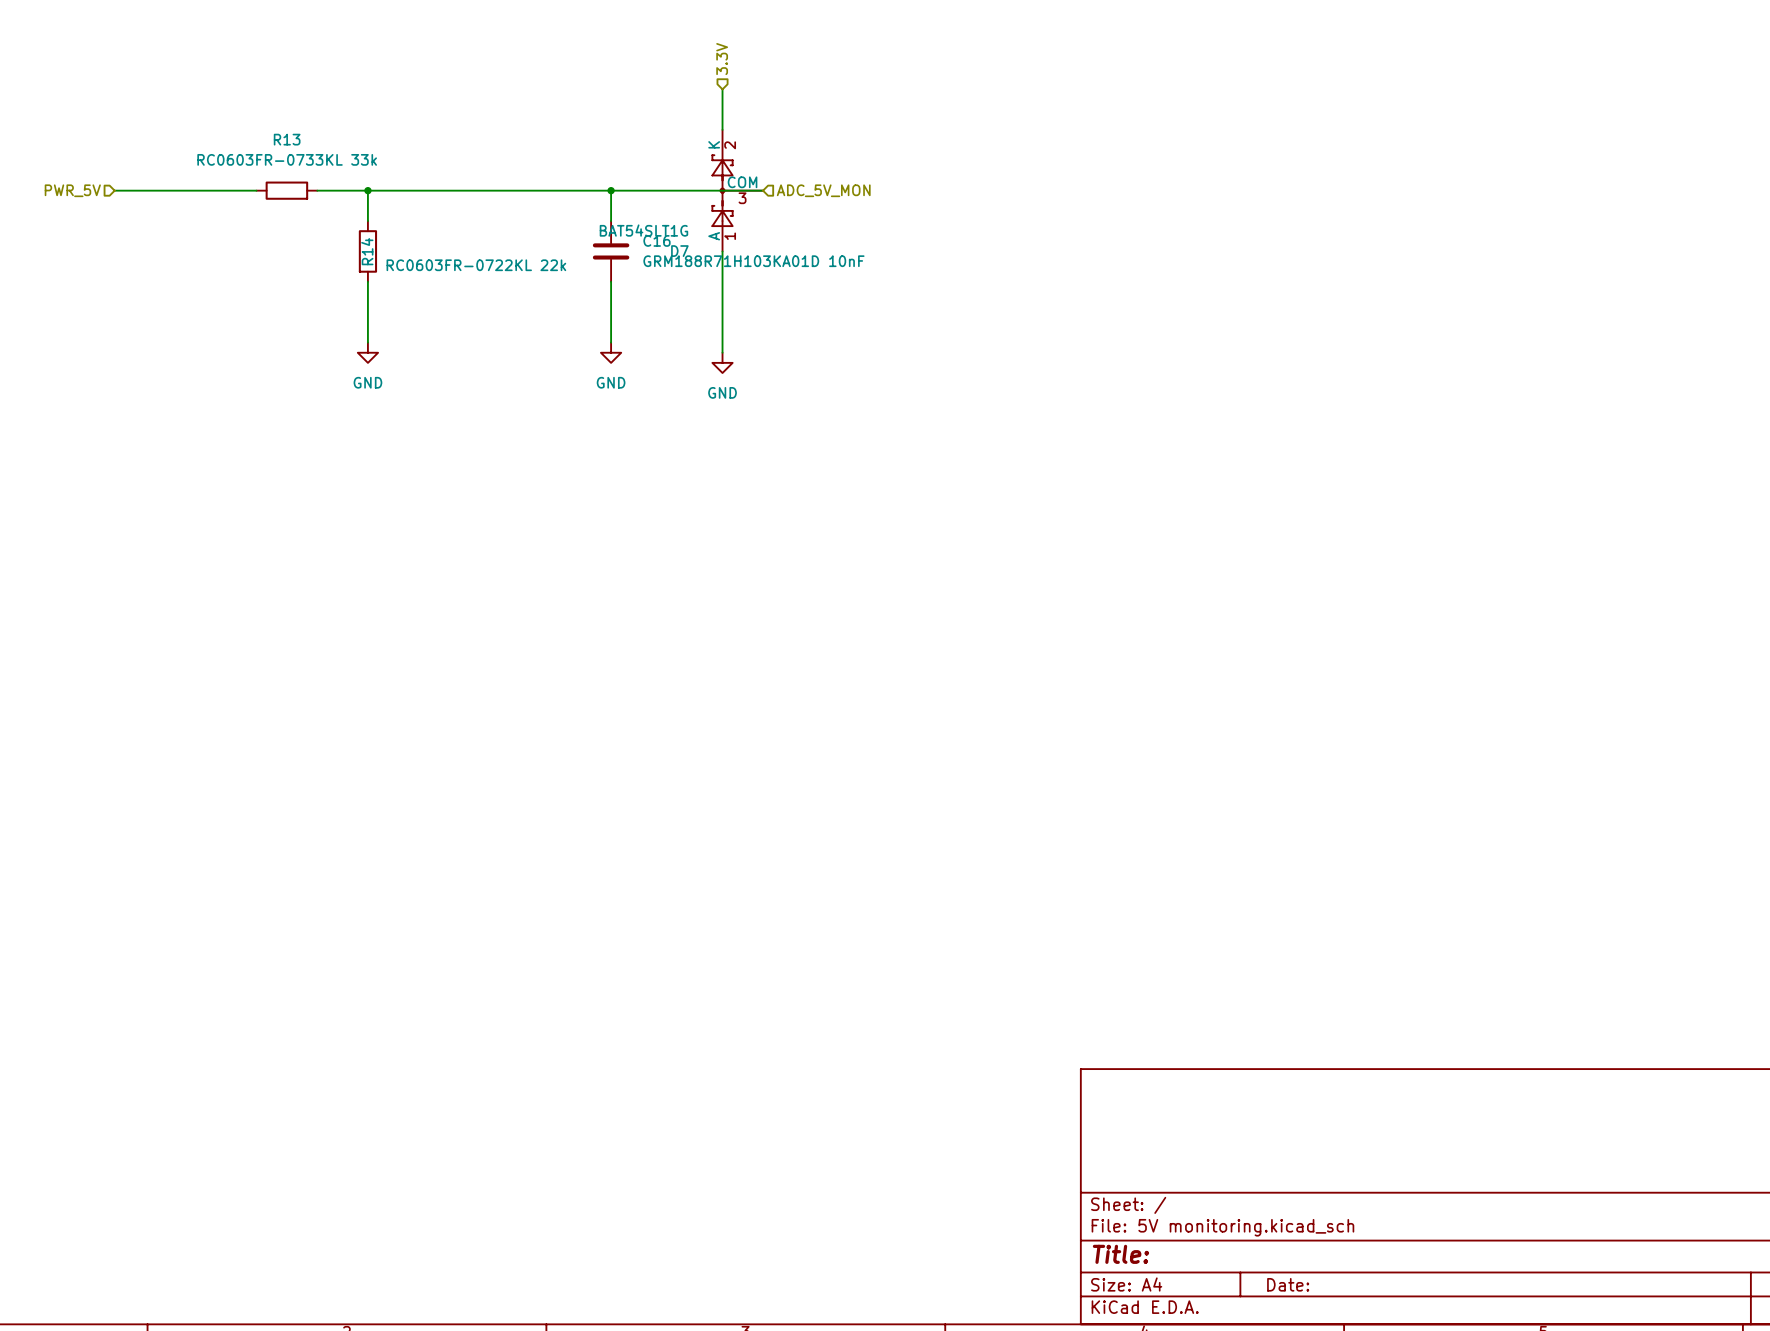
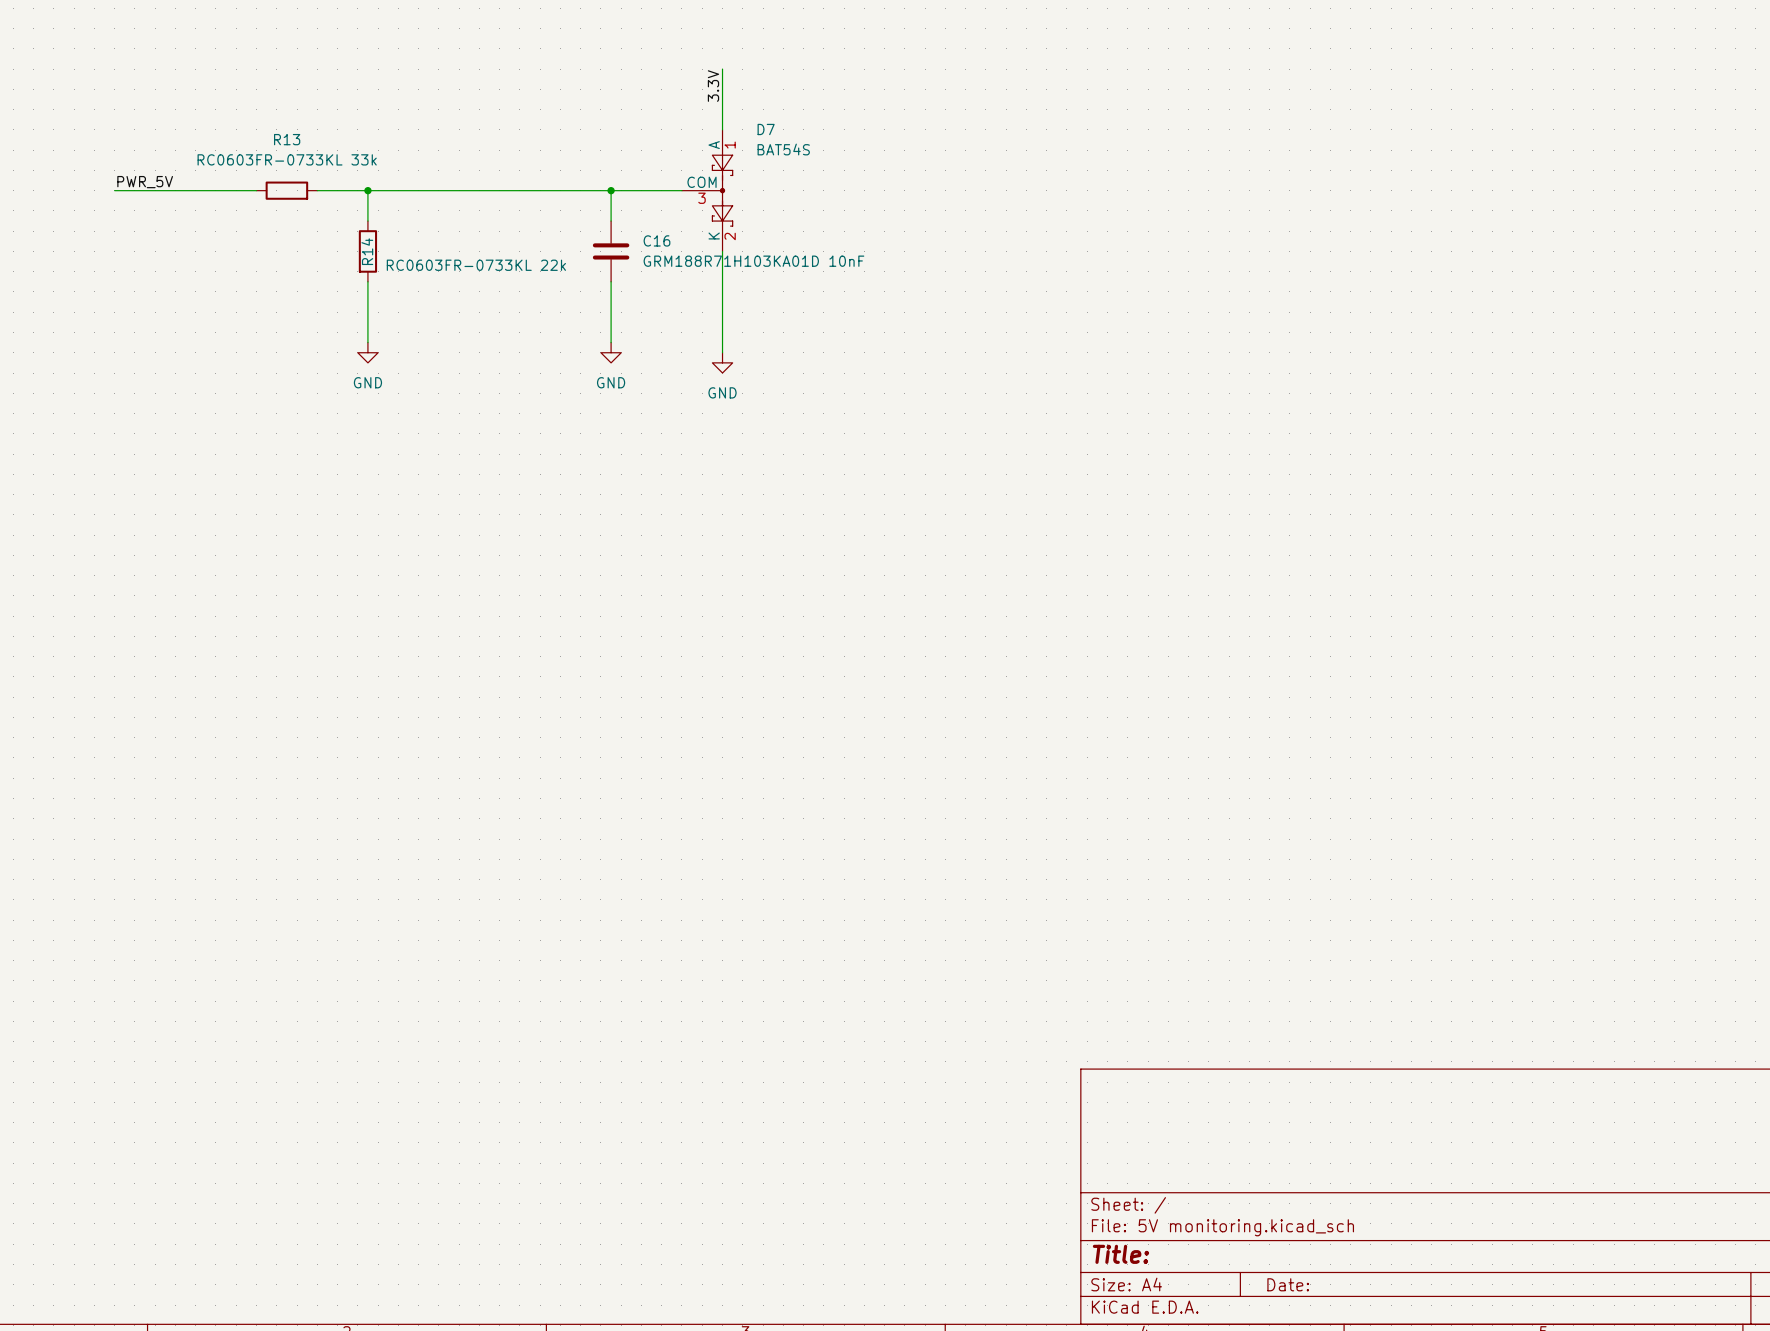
hierarchical label: 3.3V (722, 59) -> none
wire: none -> (722, 69) (722, 89)
label: none -> 3.3V (713, 86)
label: none -> PWR_5V (145, 182)
hierarchical label: PWR_5V (72, 190) -> none
D7 rotation: 0° (722, 190) -> 180° (722, 190)
hierarchical label: ADC_5V_MON (823, 190) -> none
D7 value: BAT54SLT1G (643, 230) -> BAT54S (783, 149)
R14 value: RC0603FR-0722KL 22k (476, 265) -> RC0603FR-0733KL 22k (476, 265)

